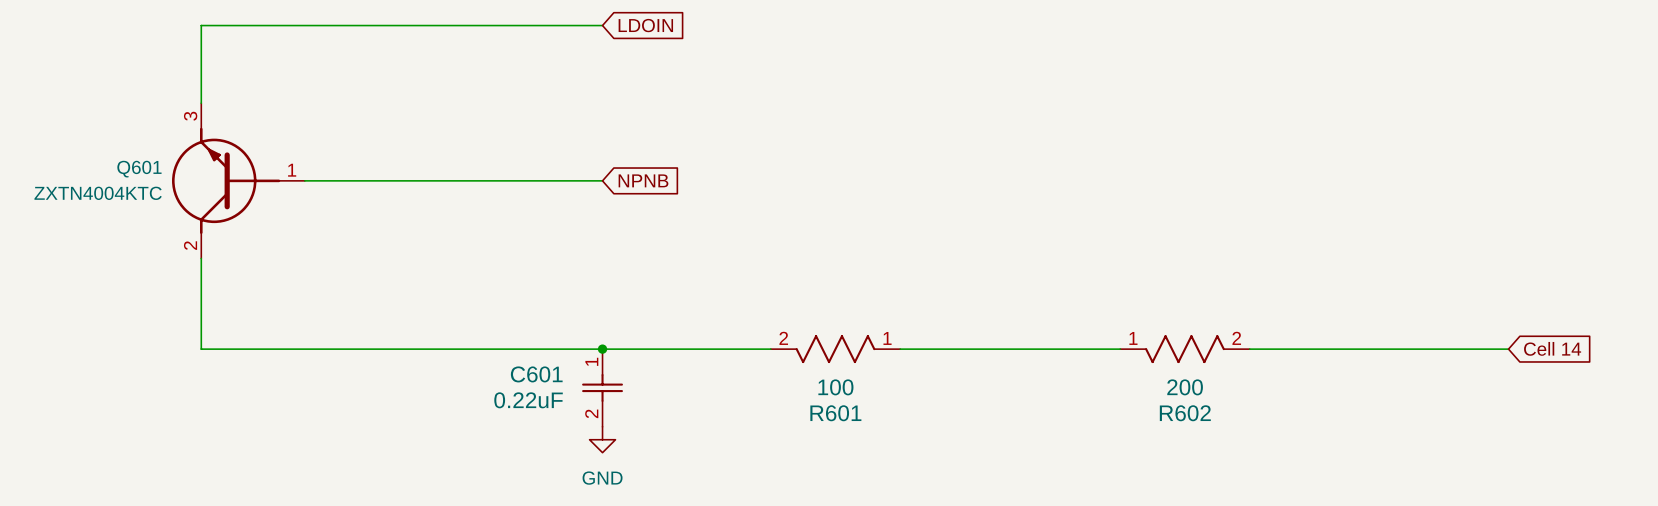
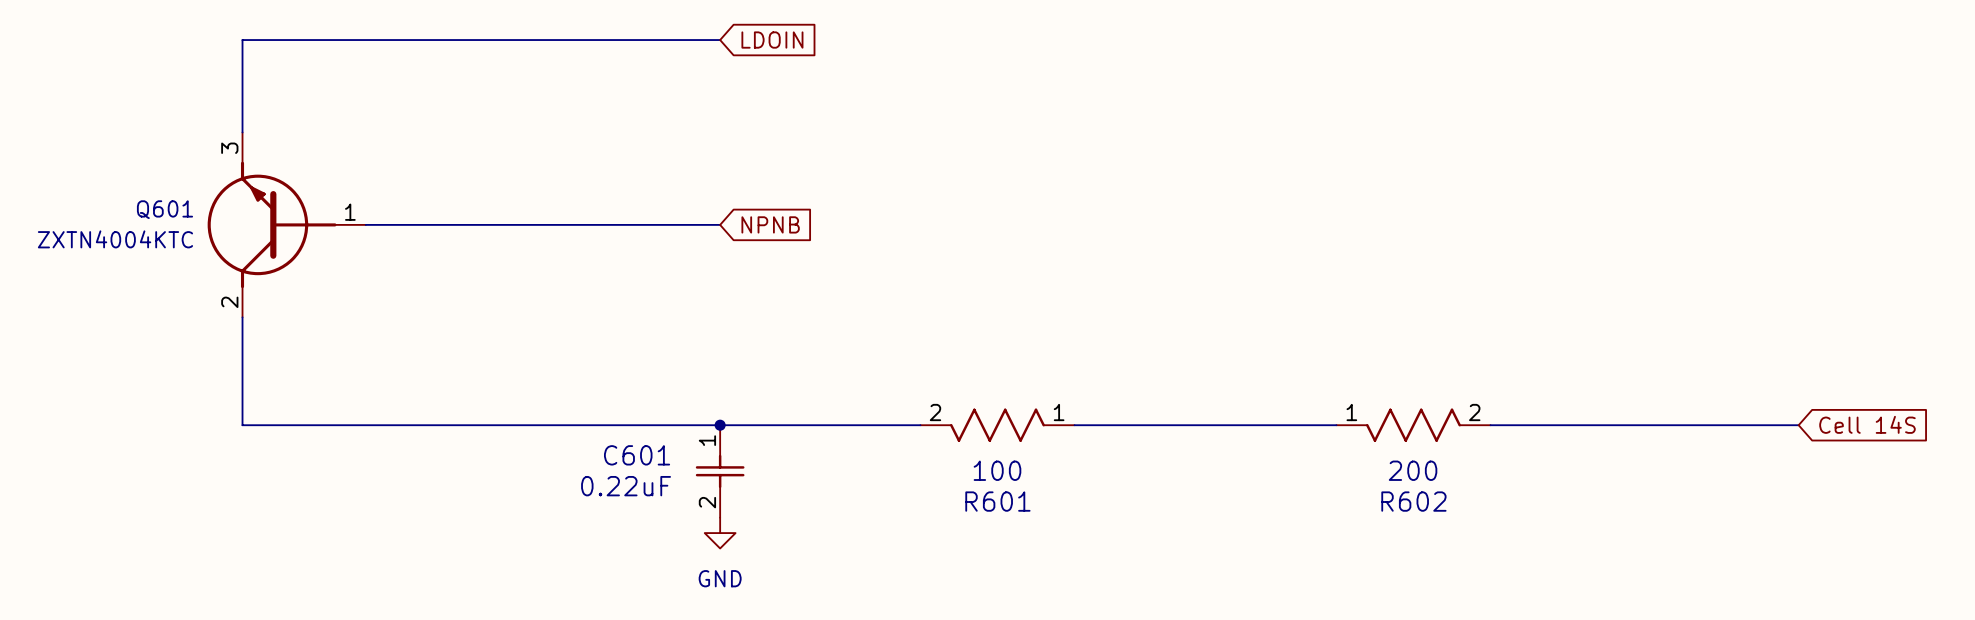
global label: Cell 14 (1552, 348) -> Cell 14S (1867, 424)

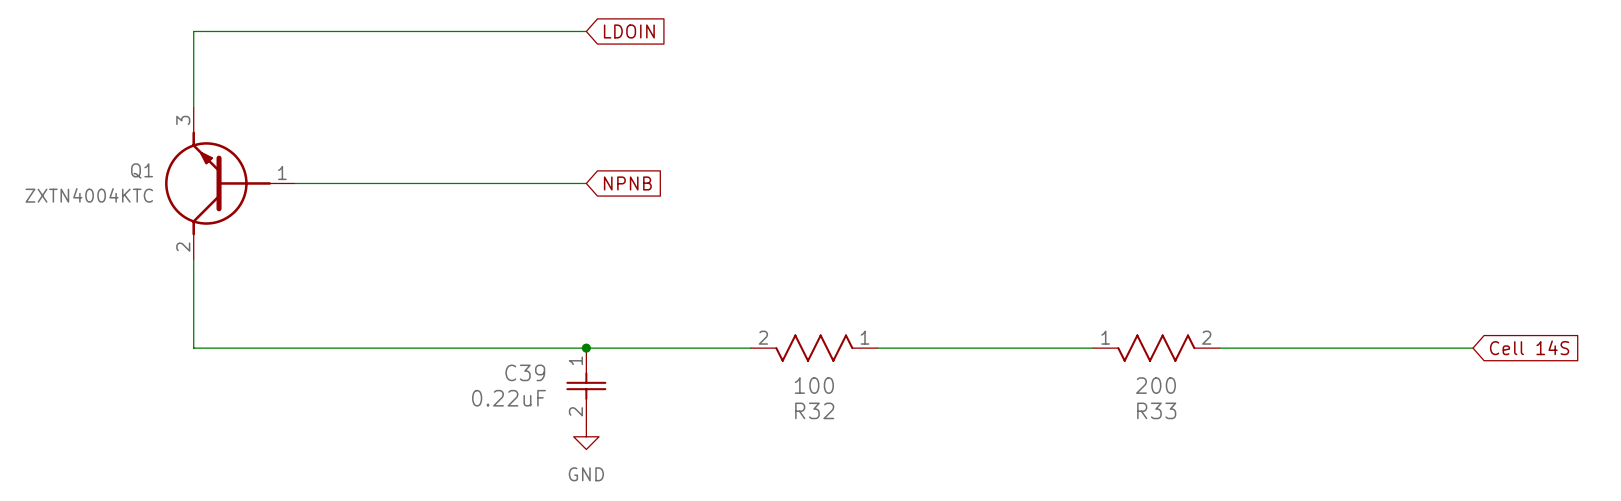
Q601 name: Q601 (164, 209) -> Q1 (142, 170)
C601 name: C601 (637, 455) -> C39 (525, 372)
R601 name: R601 (997, 501) -> R32 (814, 410)
R602 name: R602 (1413, 501) -> R33 (1156, 410)

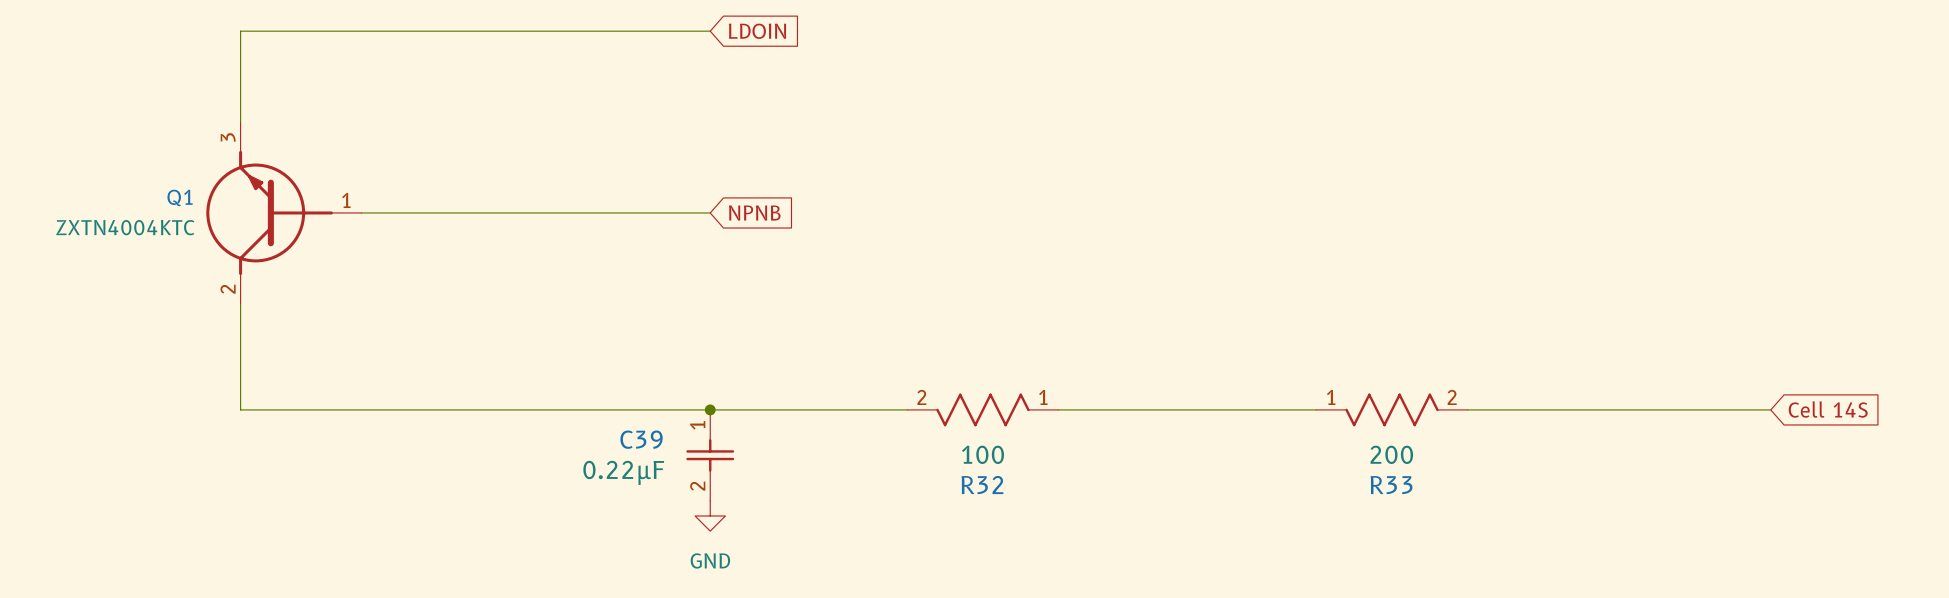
C39 value: 0.22uF (509, 398) -> 0.22µF (623, 472)

